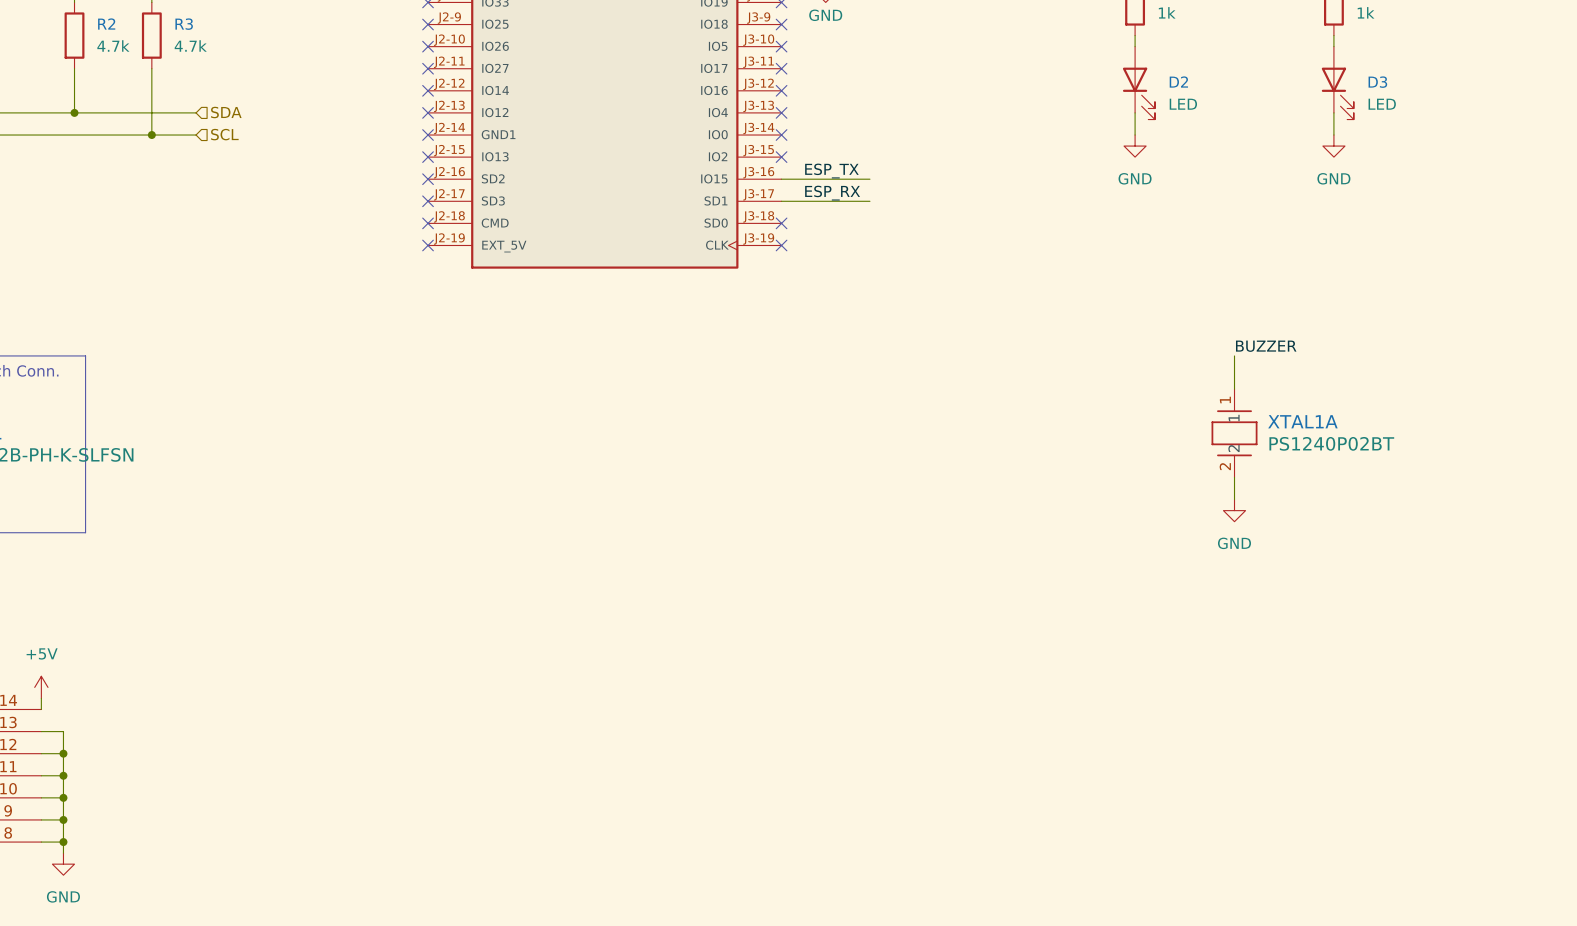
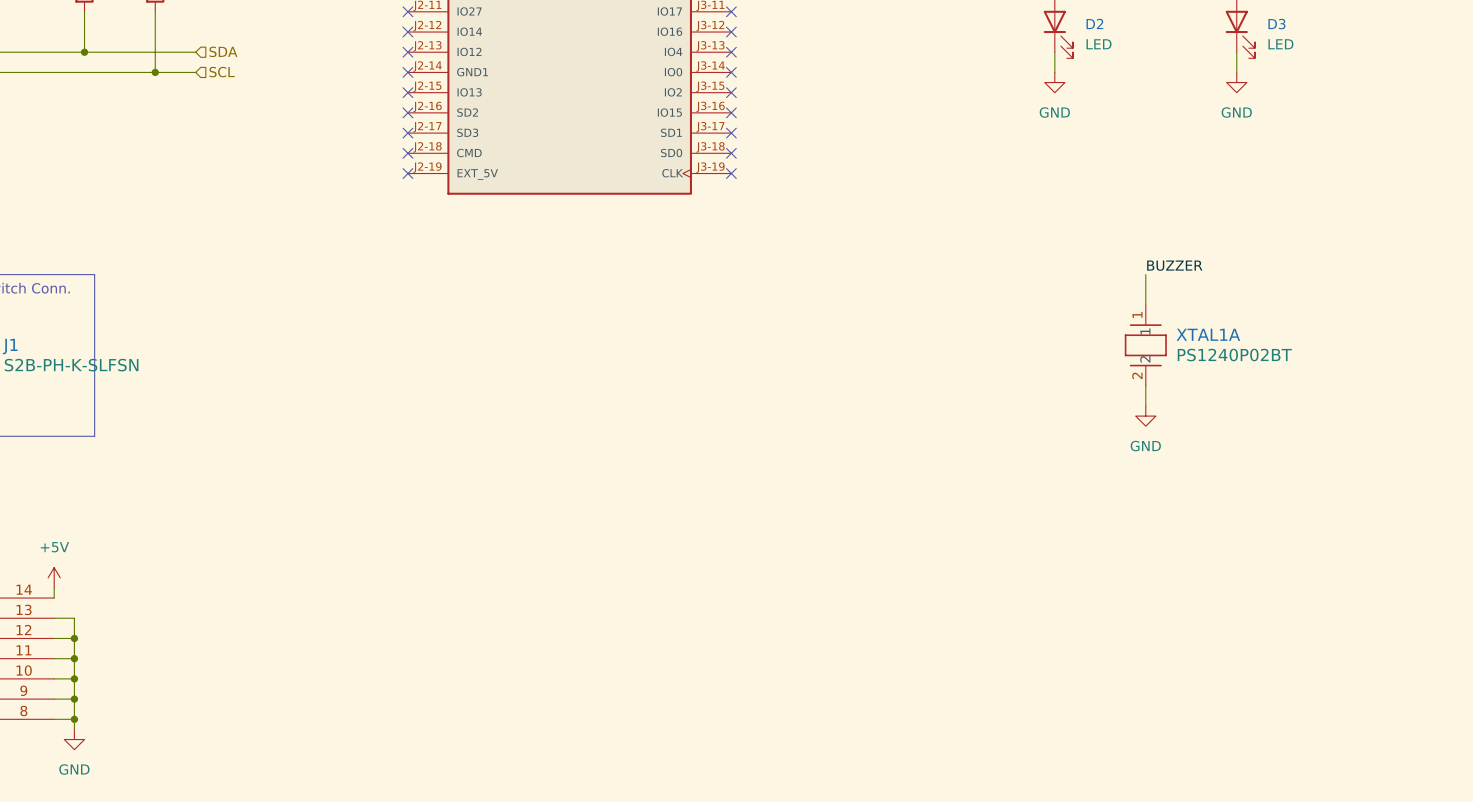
label: ESP_TX (831, 171) -> none
wire: (781, 179) (869, 179) -> none
no-connect mark: none -> (731, 112)
label: ESP_RX (832, 193) -> none
wire: (781, 201) (869, 201) -> none
no-connect mark: none -> (731, 133)

